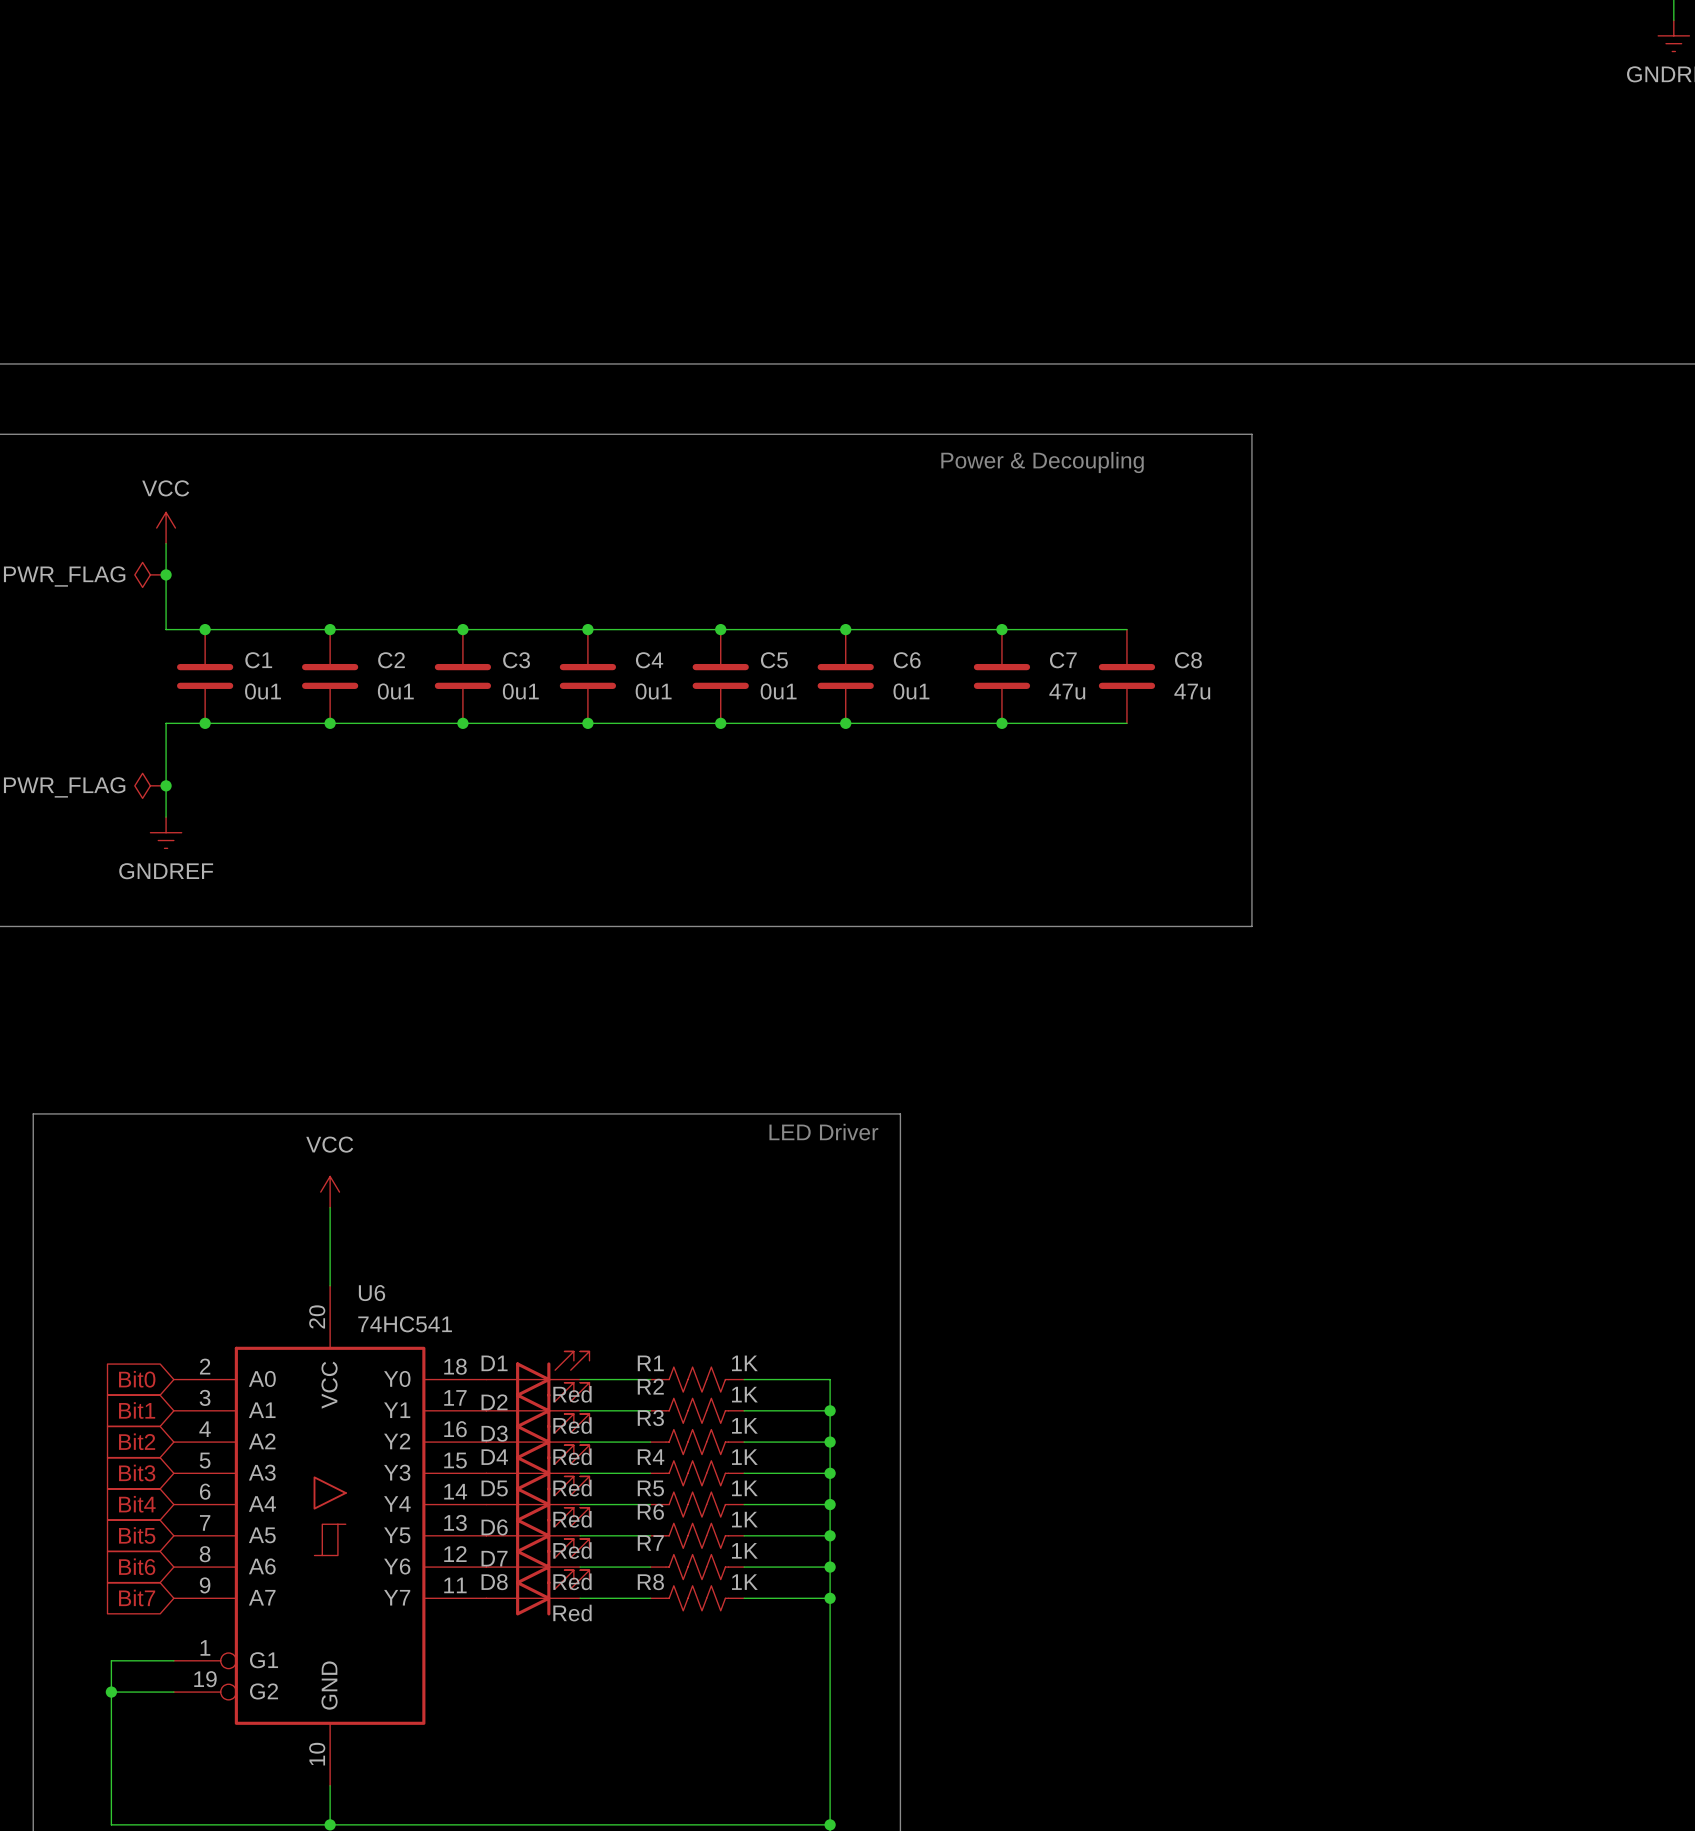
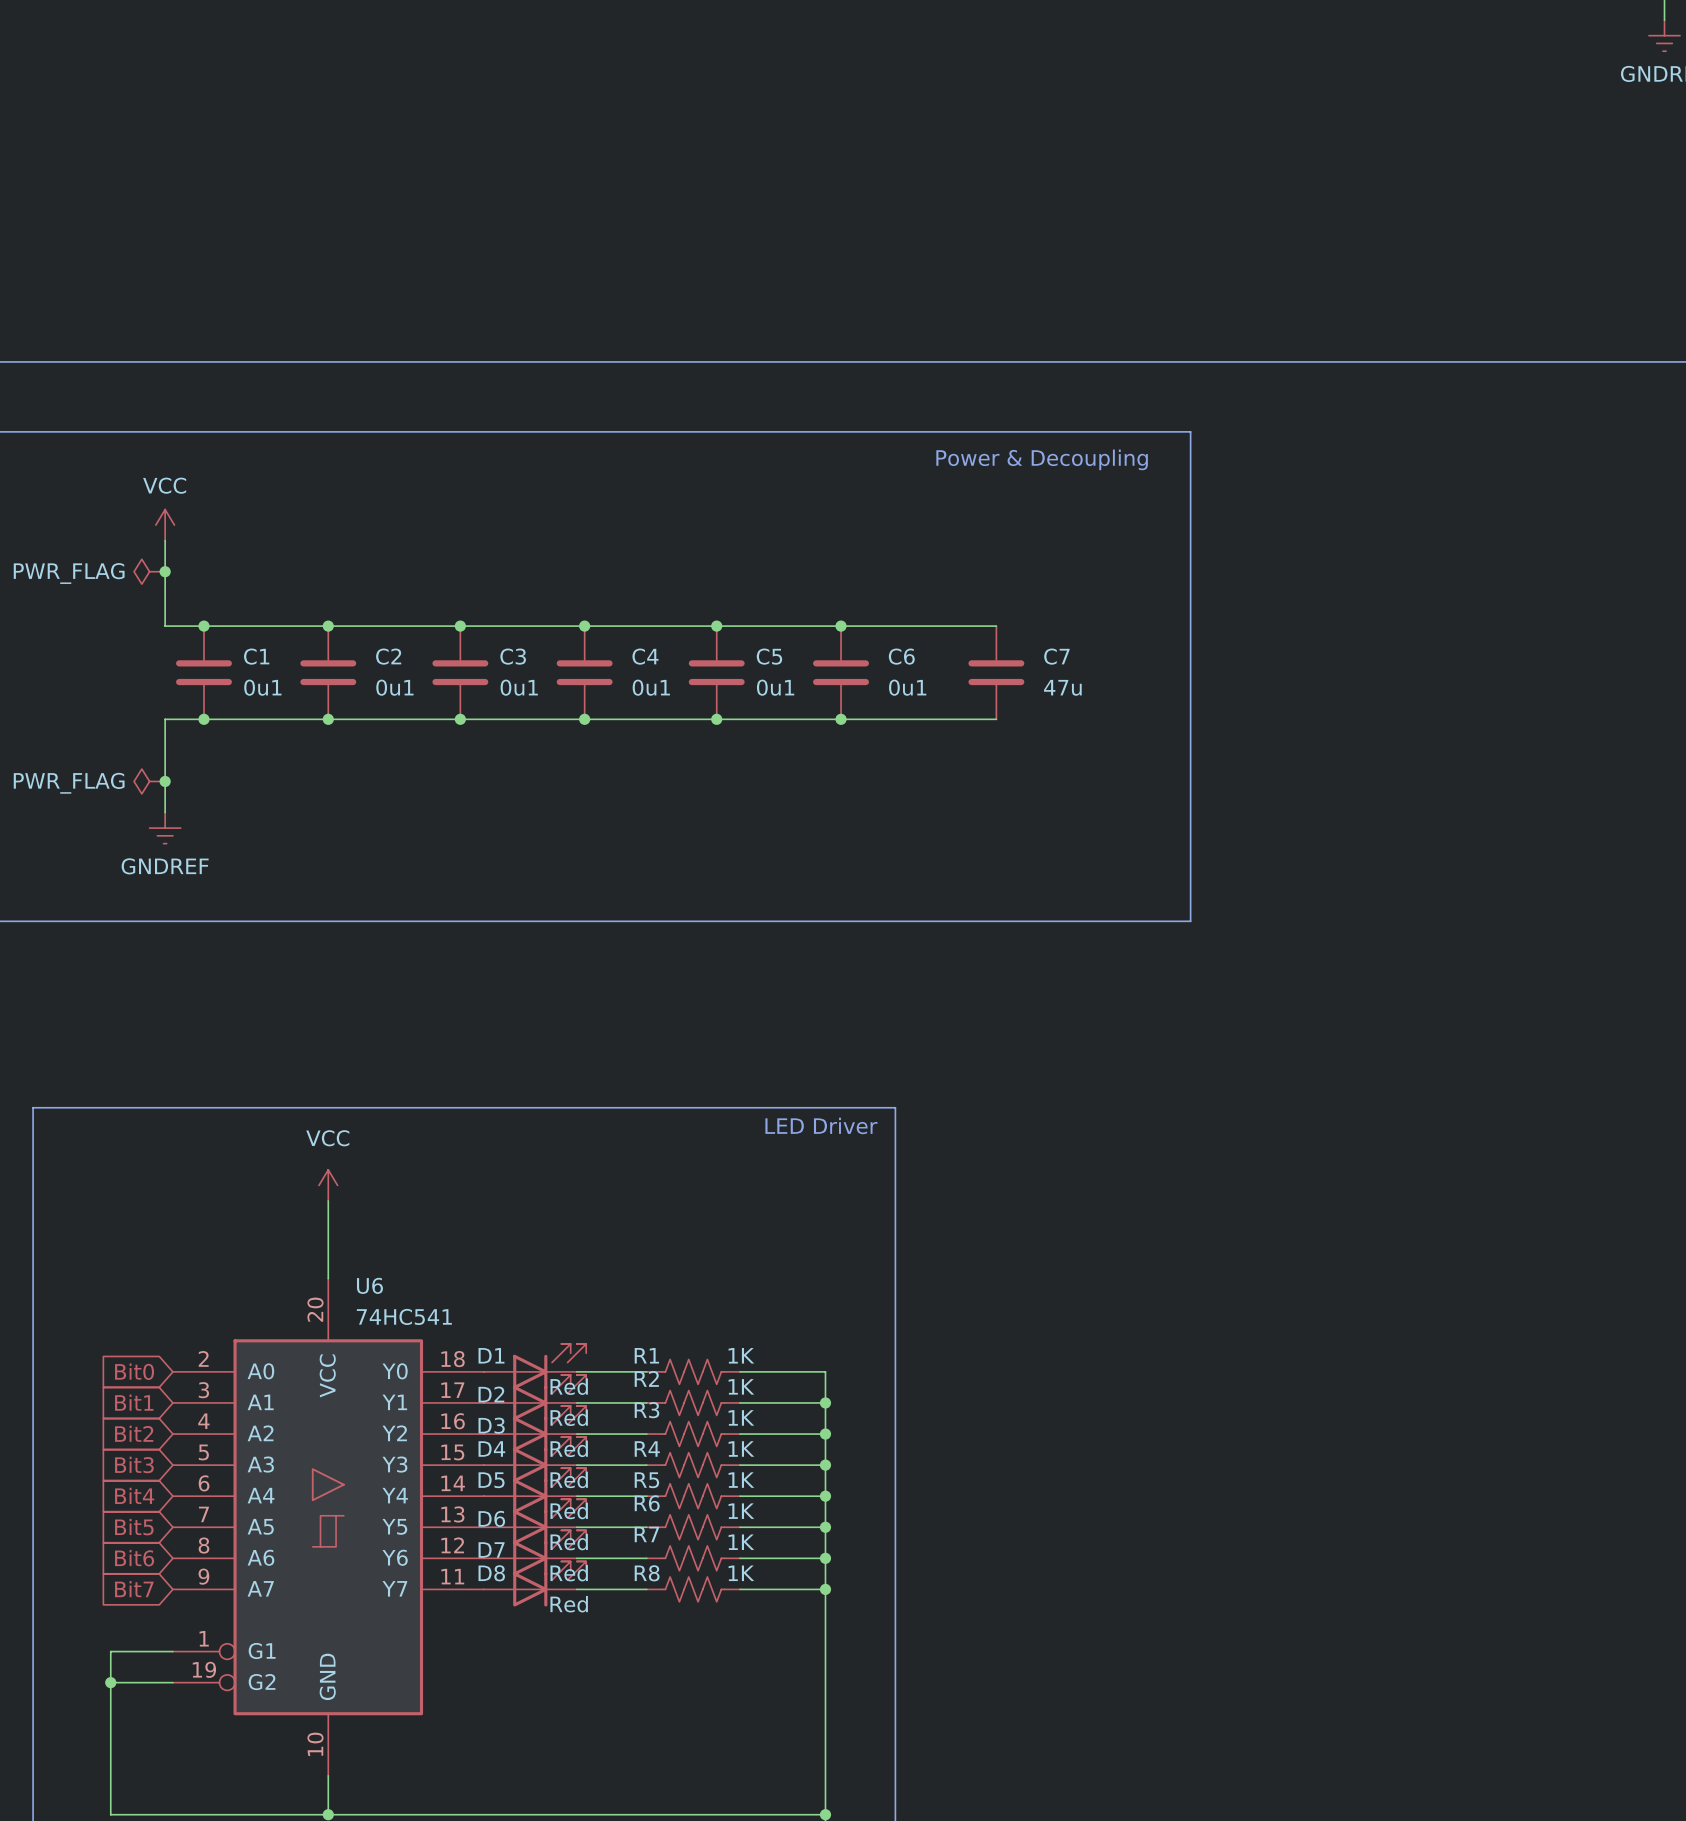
line: (1197, 434) (1251, 434) (1251, 926) (1197, 926) -> (1190, 431) (1190, 921)
wire: (1001, 629) (1126, 629) -> none
junction: (1001, 629) -> none
C8: 47u (1126, 676) -> none
wire: (1001, 723) (1126, 723) -> none
junction: (1001, 723) -> none

